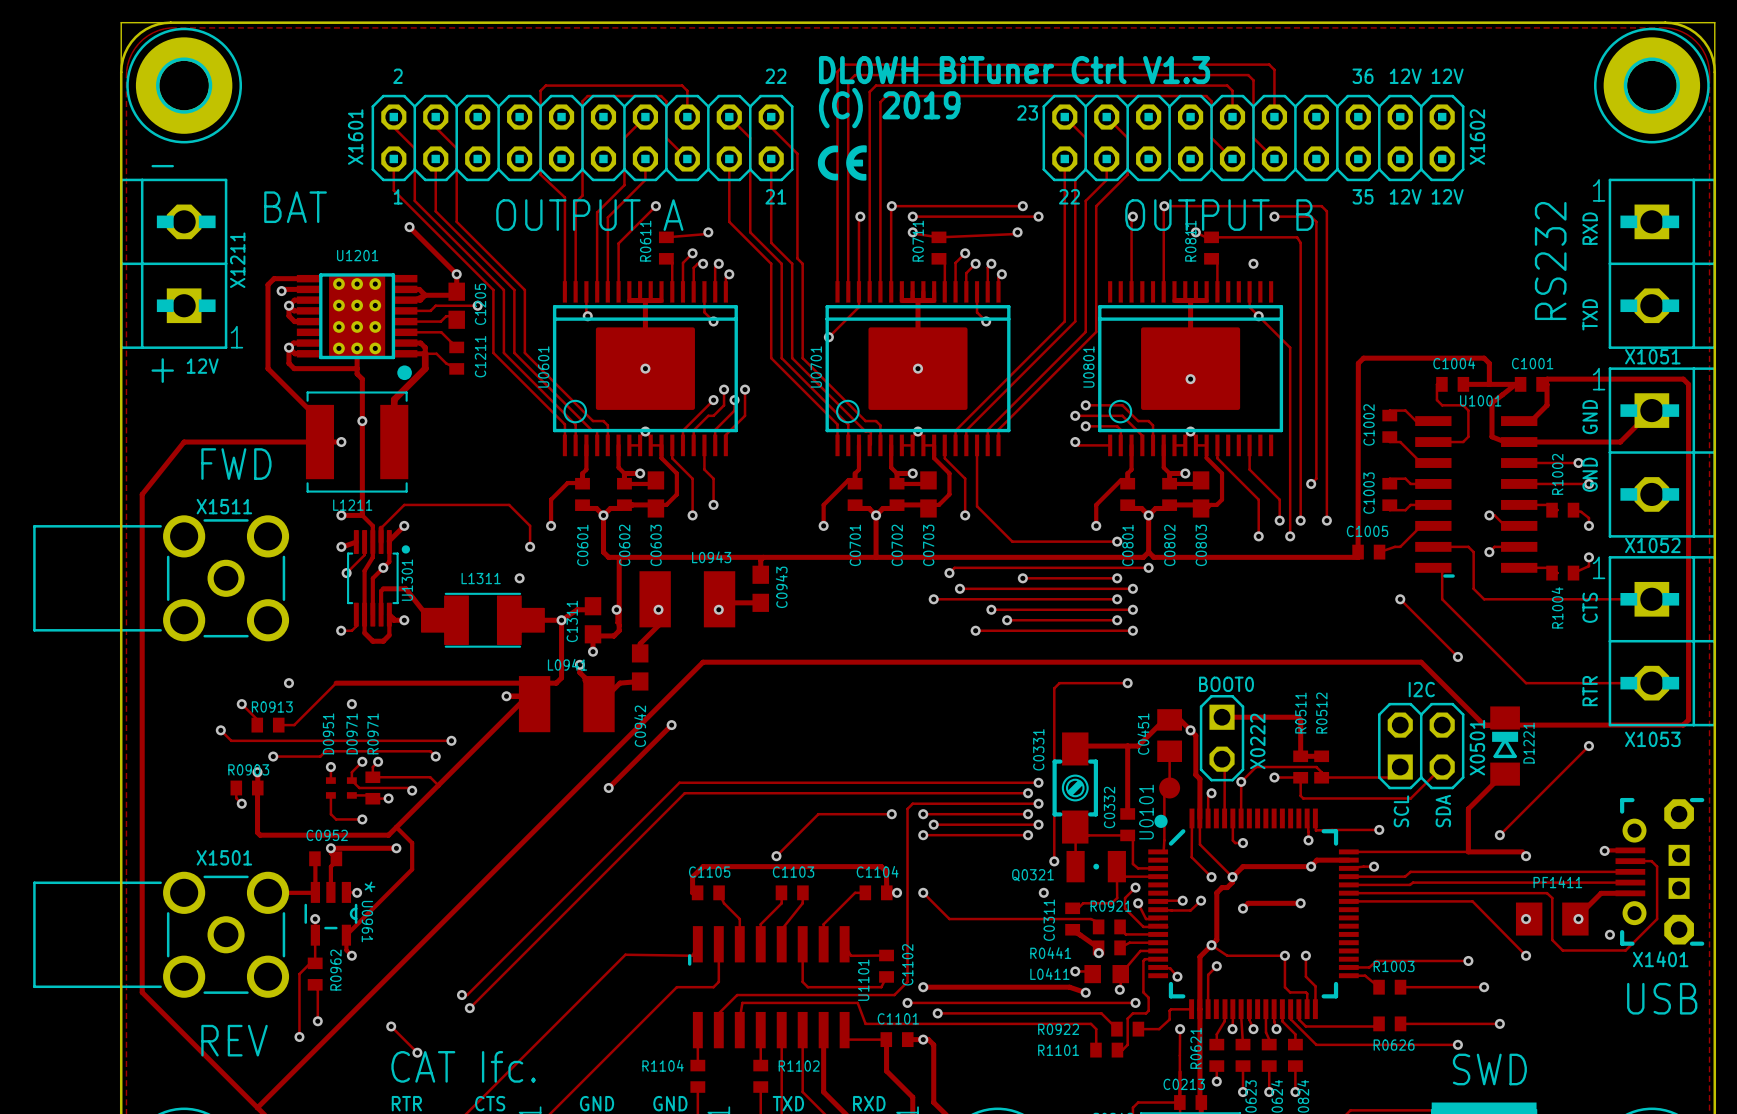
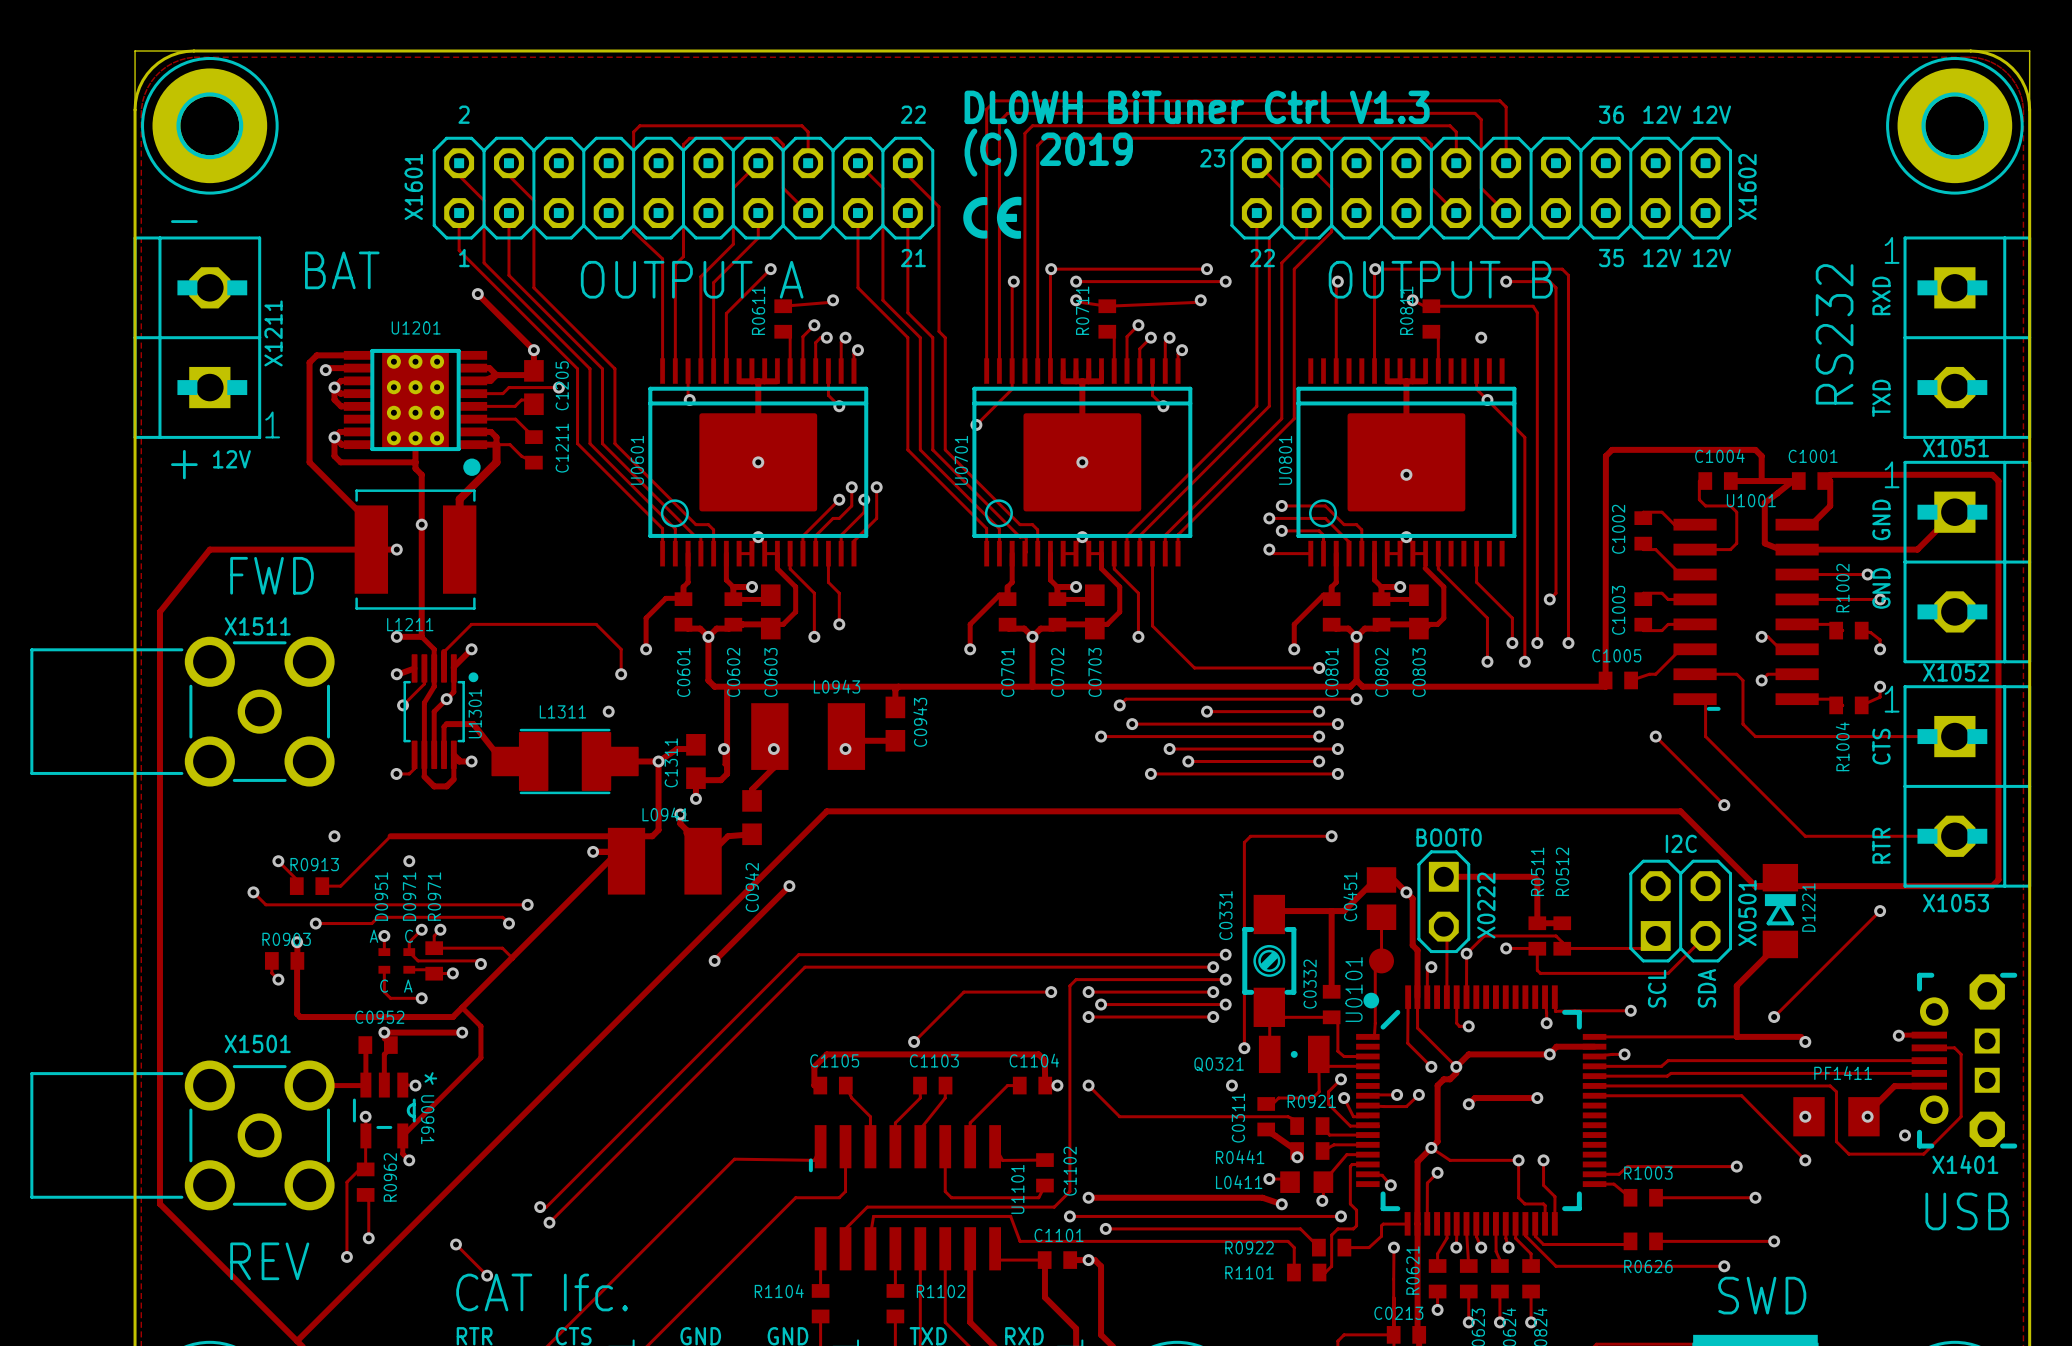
text: none -> A (374, 936)
text: none -> C (409, 936)
text: none -> C (384, 986)
text: none -> A (408, 986)

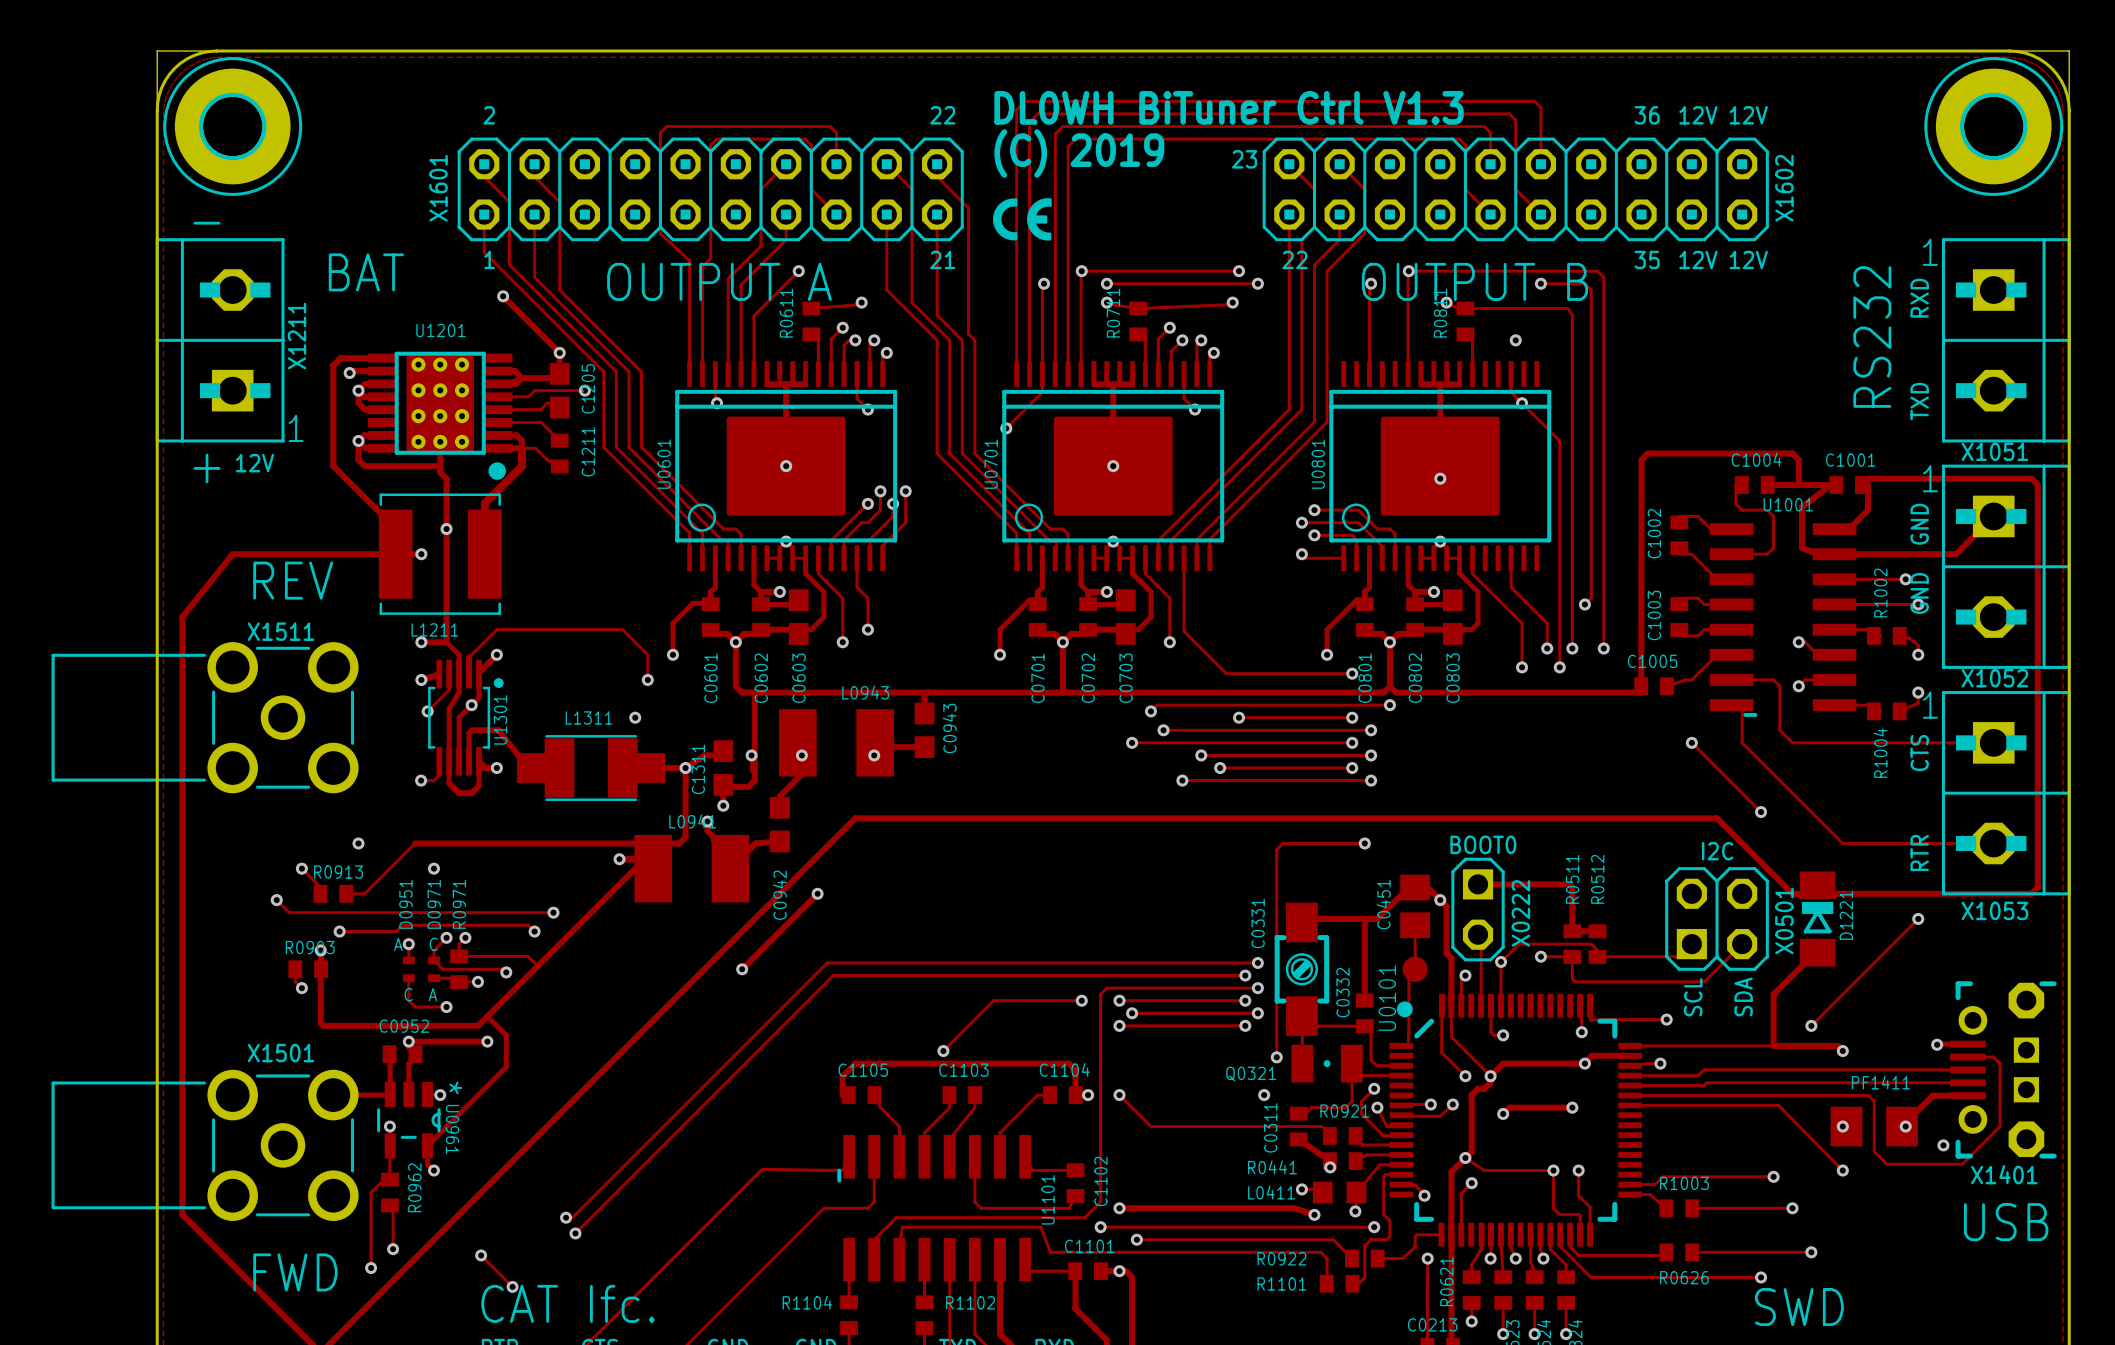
text: FWD (272, 575) -> REV (293, 580)
text: REV (269, 1261) -> FWD (295, 1272)

